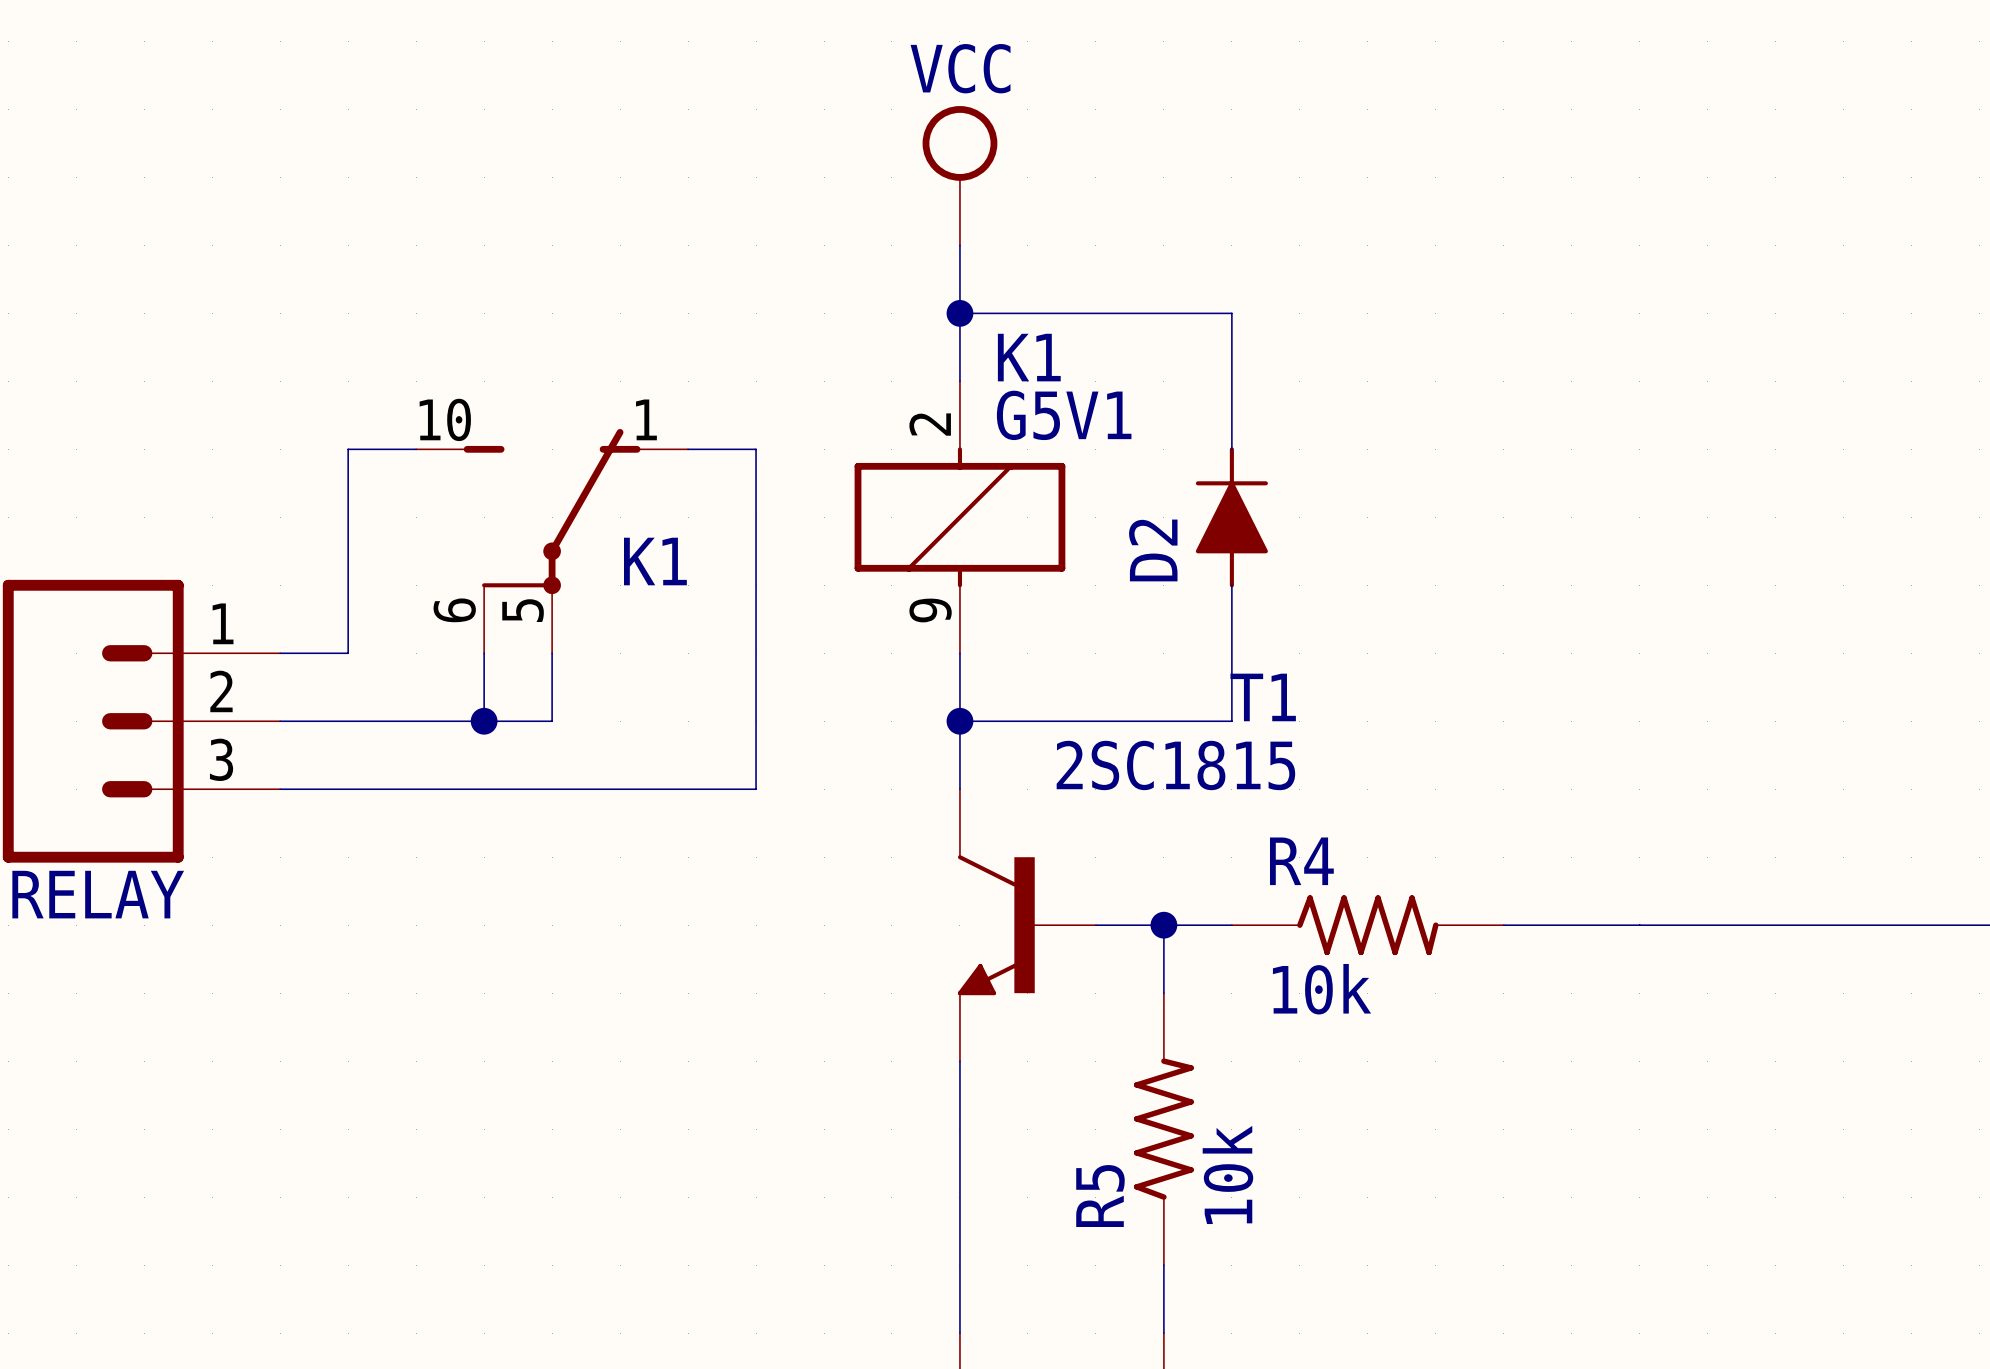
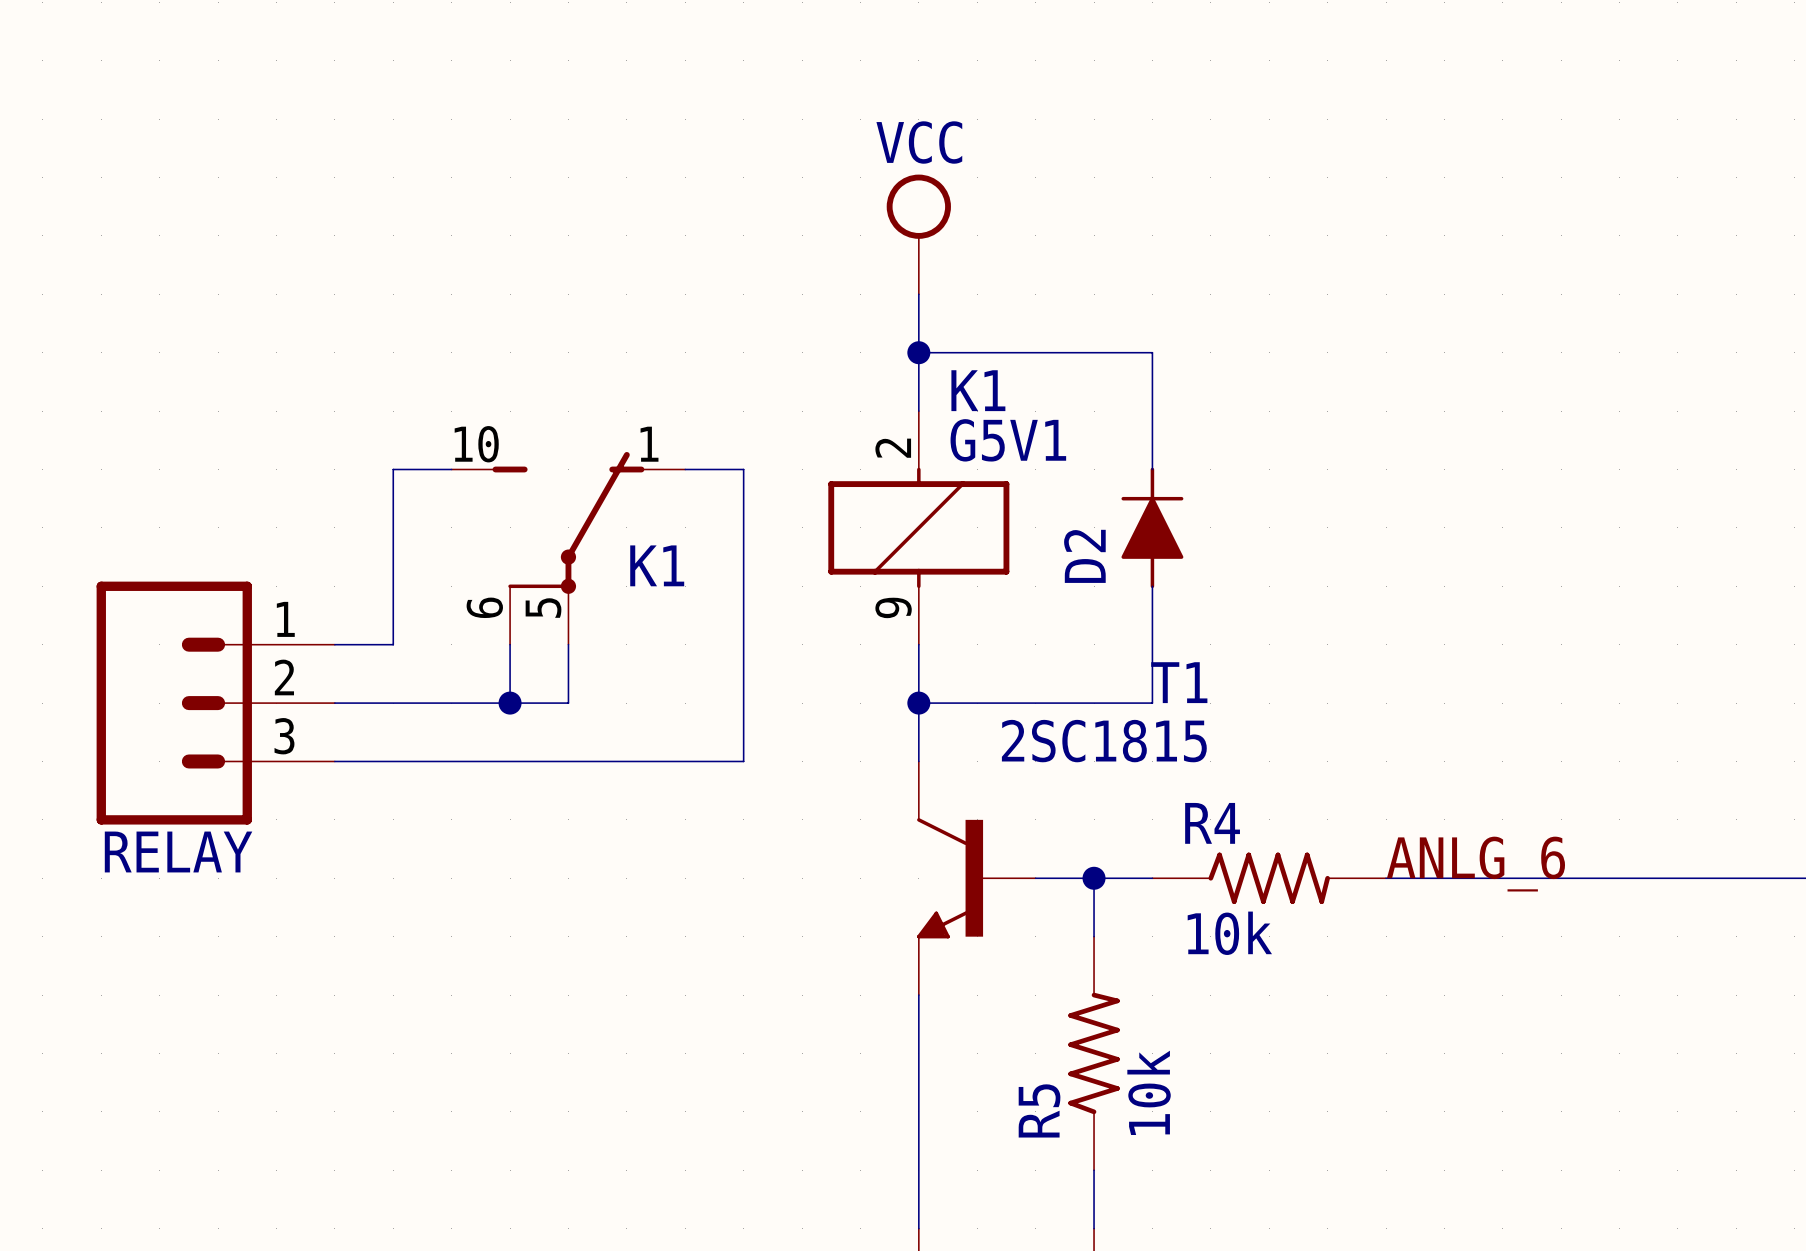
label: none -> ANLG_6 (1475, 864)

